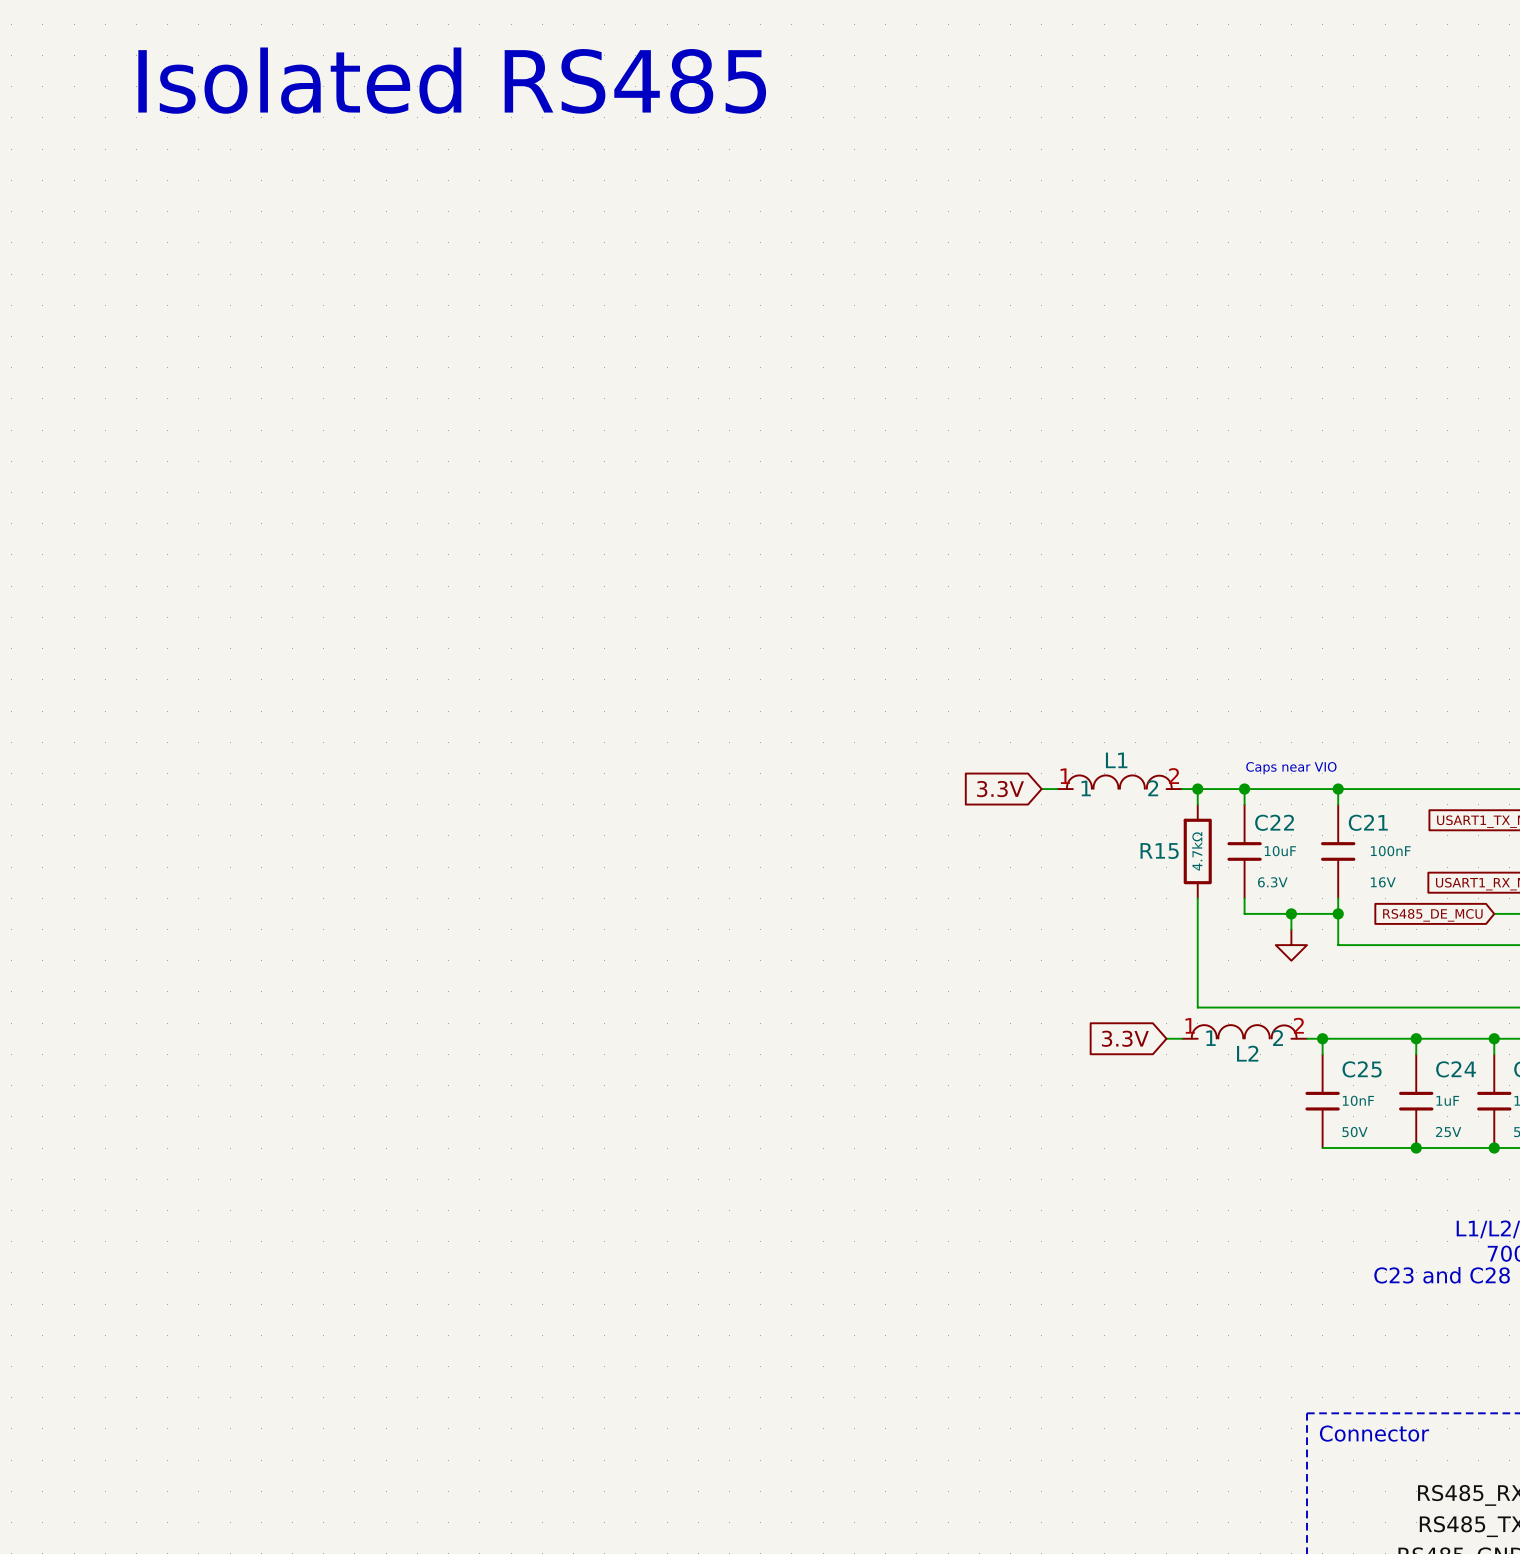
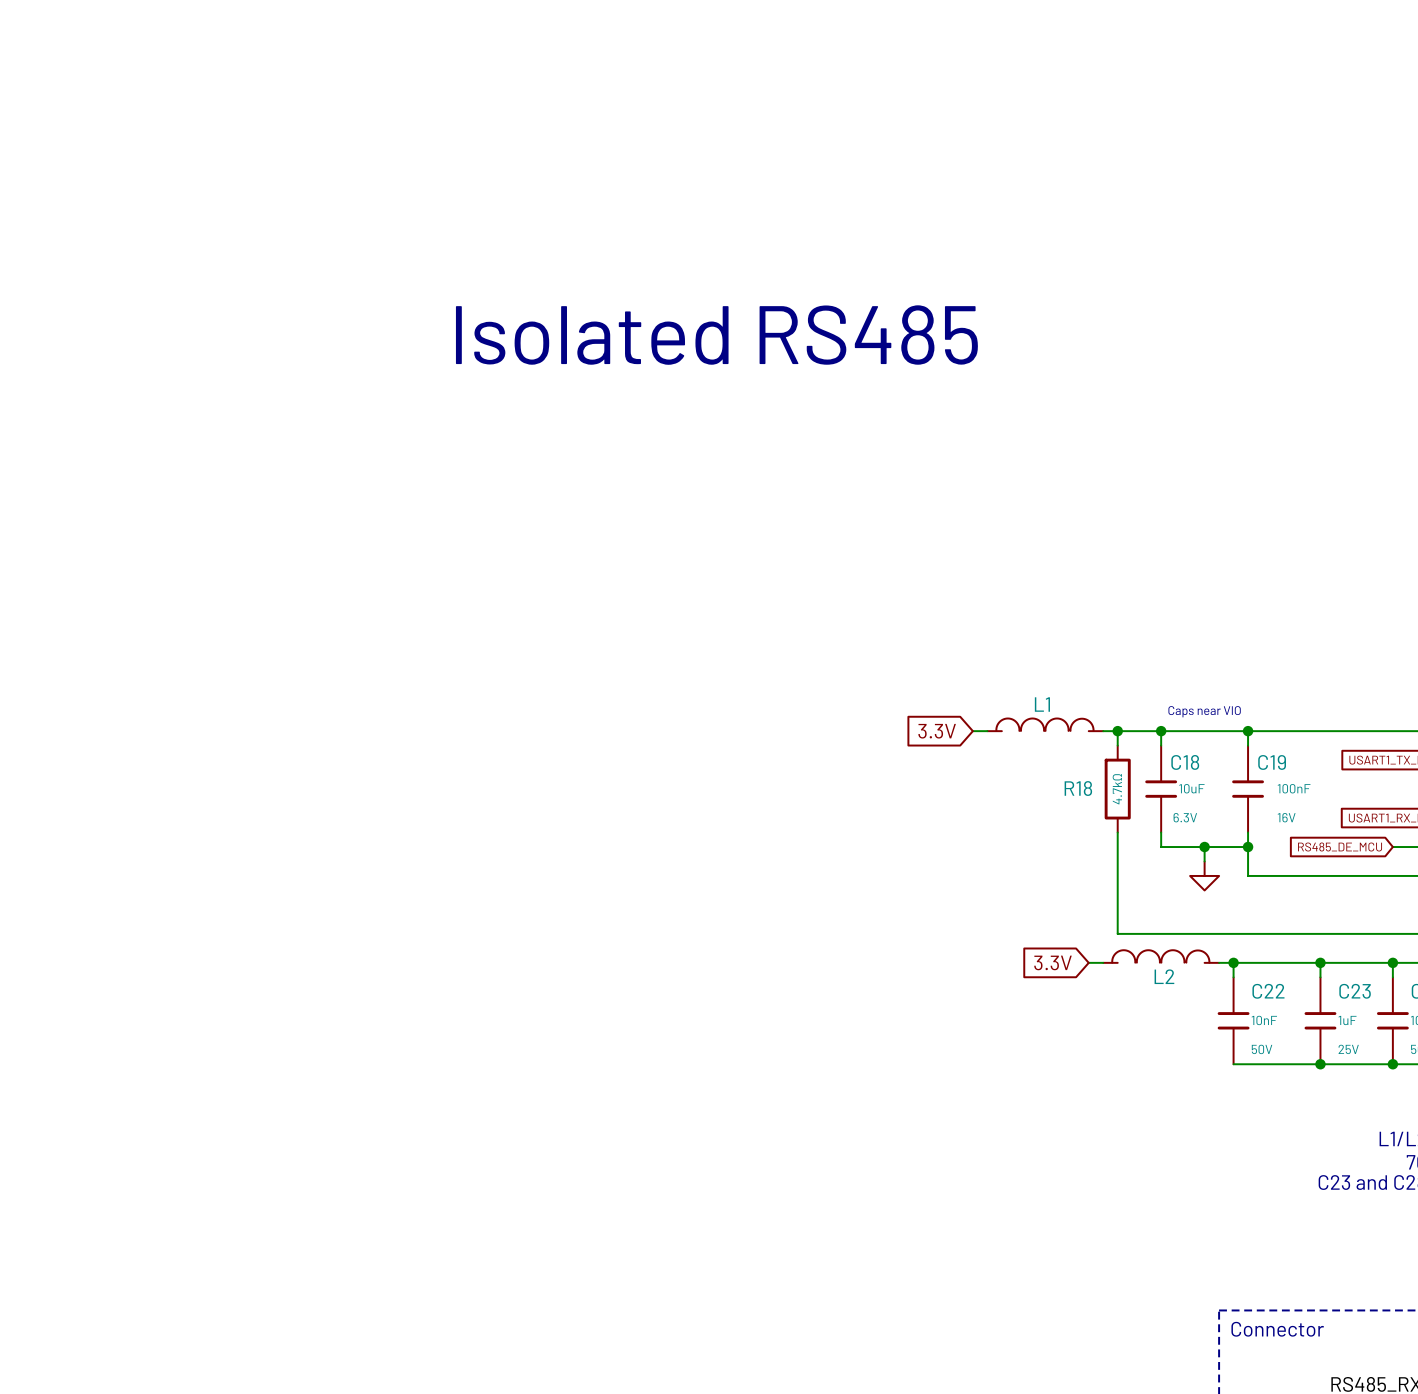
text: Isolated RS485 (452, 80) -> none
text: none -> Isolated RS485 (716, 335)
L1 pin number: 1 (1065, 776) -> none
L1 pin number: 2 (1174, 776) -> none
L1 pin name: 1 (1086, 788) -> none
L1 pin name: 2 (1153, 788) -> none
C22 name: C22 (1274, 822) -> C18 (1185, 762)
C21 name: C21 (1368, 822) -> C19 (1272, 762)
R15 name: R15 (1159, 851) -> R18 (1078, 788)
L2 pin number: 1 (1190, 1025) -> none
L2 pin number: 2 (1298, 1025) -> none
L2 pin name: 1 (1210, 1038) -> none
L2 pin name: 2 (1278, 1038) -> none
C25 name: C25 (1362, 1069) -> C22 (1268, 991)
C24 name: C24 (1456, 1069) -> C23 (1355, 991)

